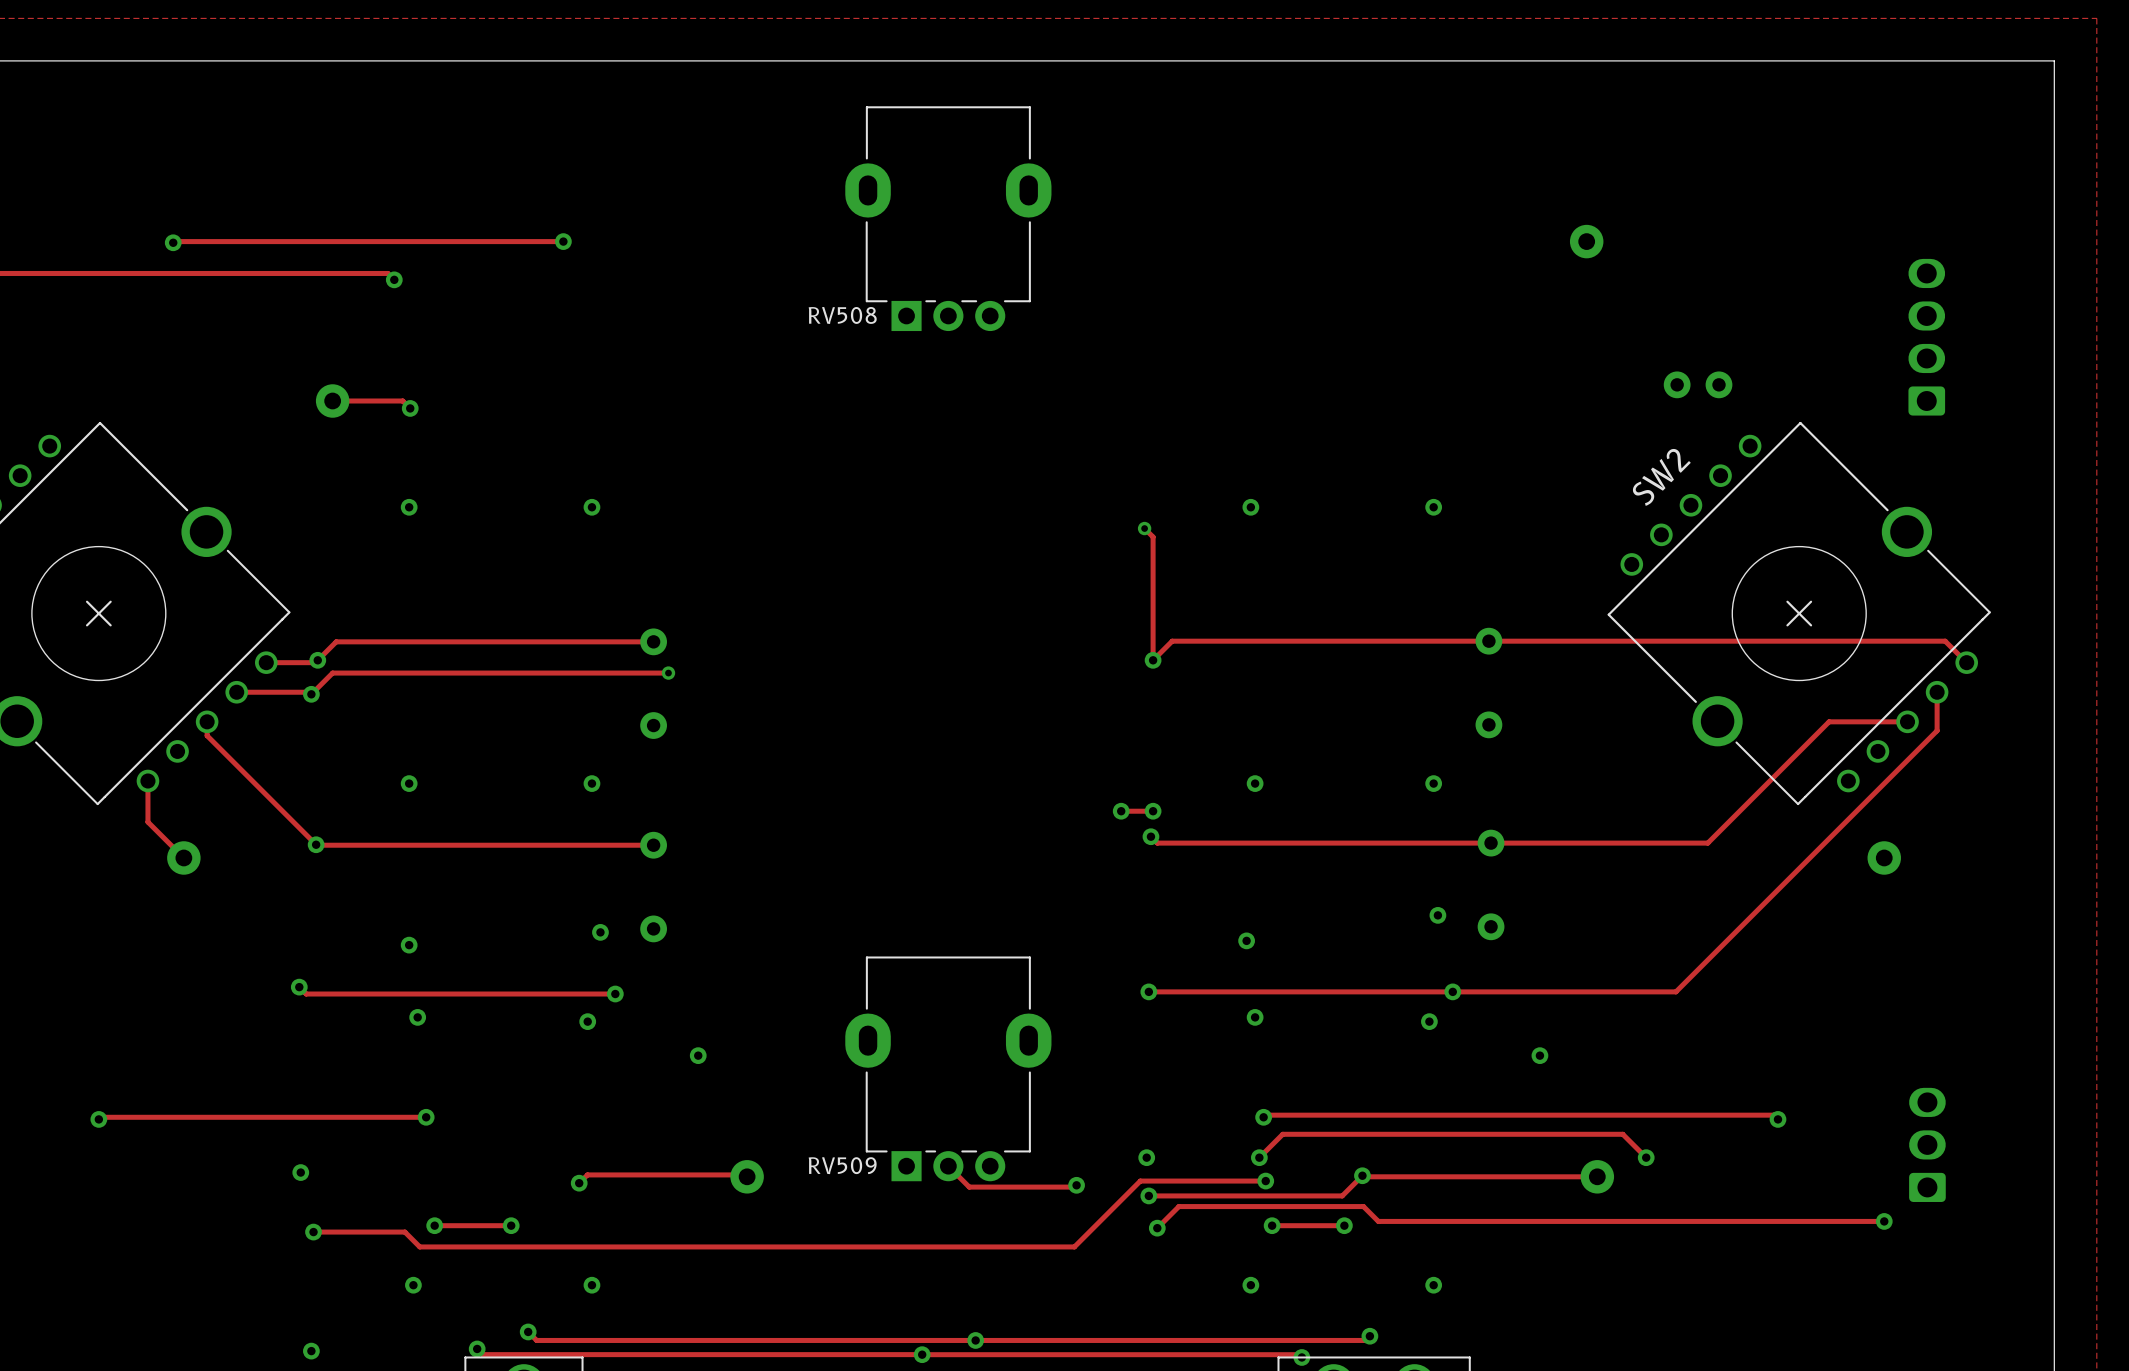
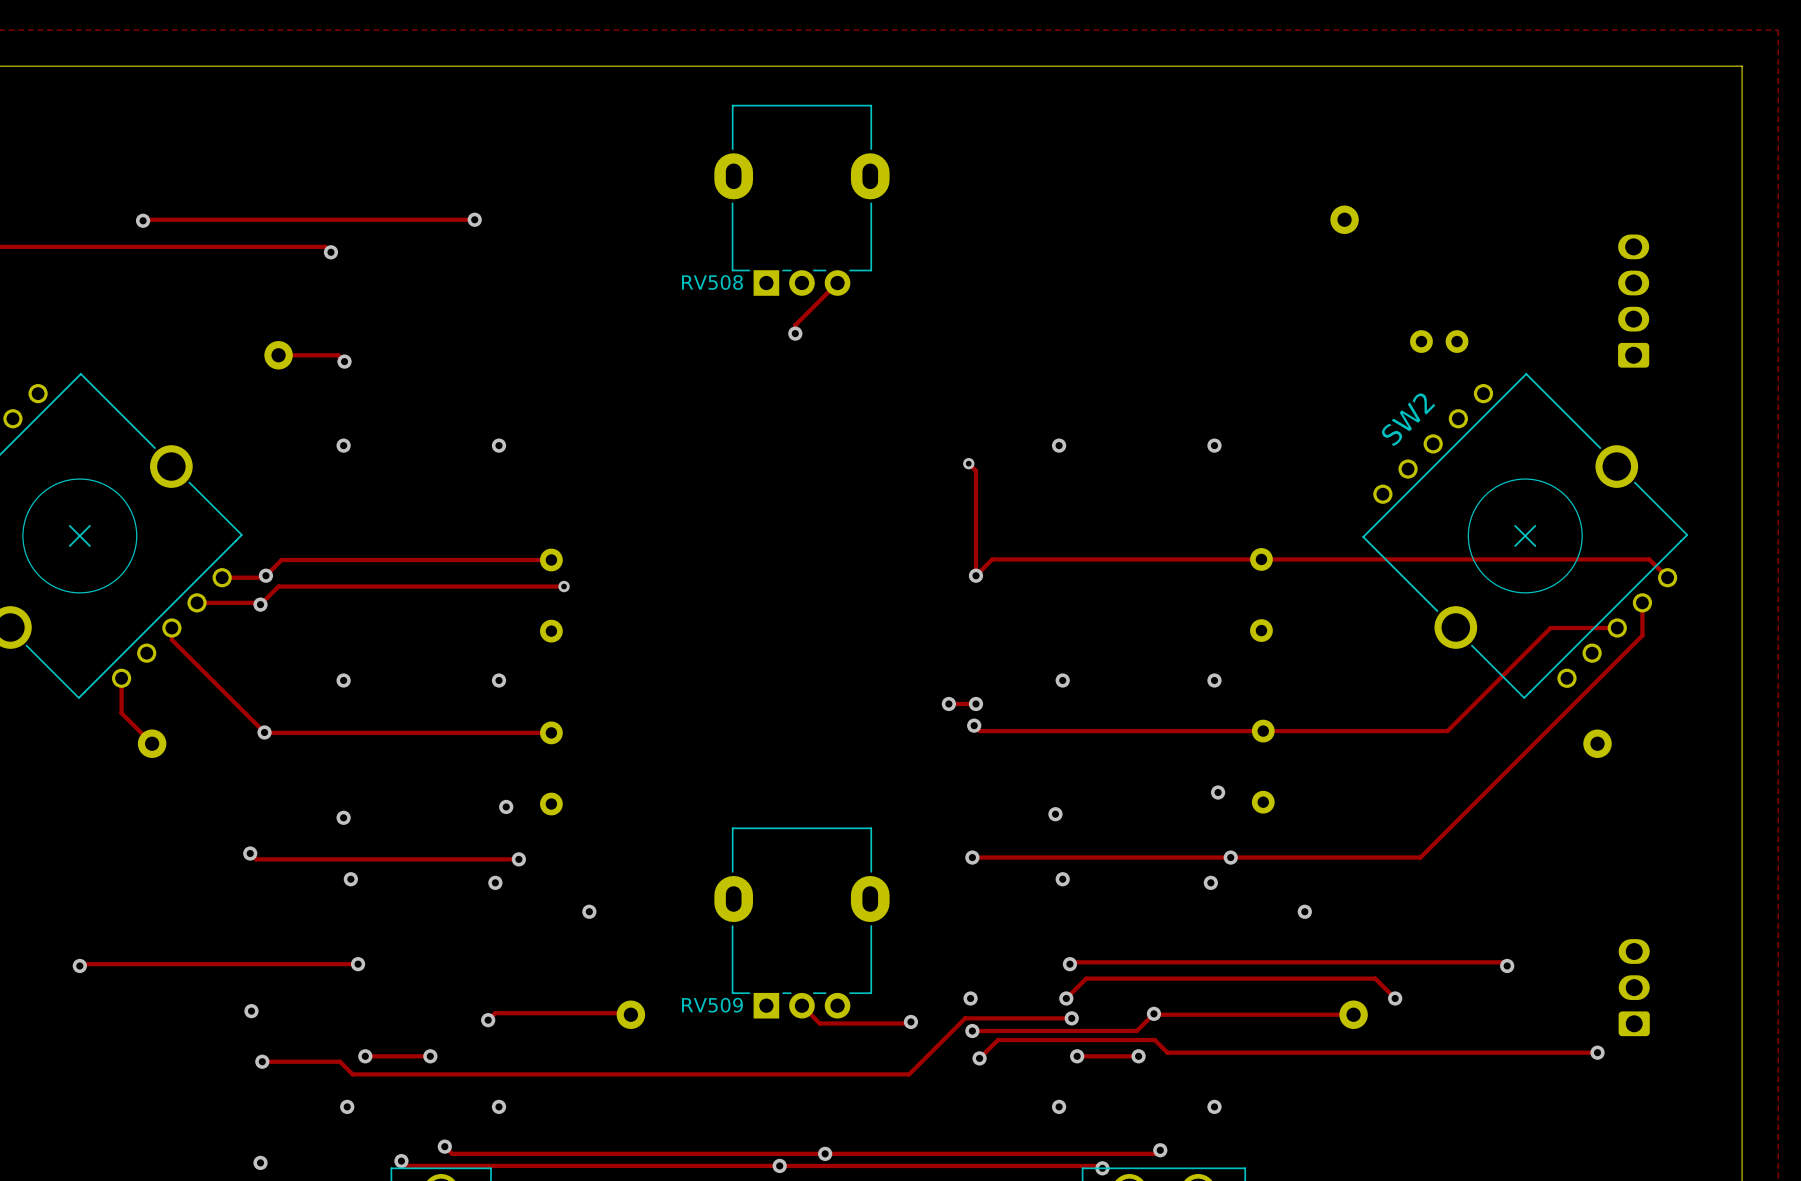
track: none -> (837, 283) (795, 325) (795, 333)
via: none -> (795, 333)

